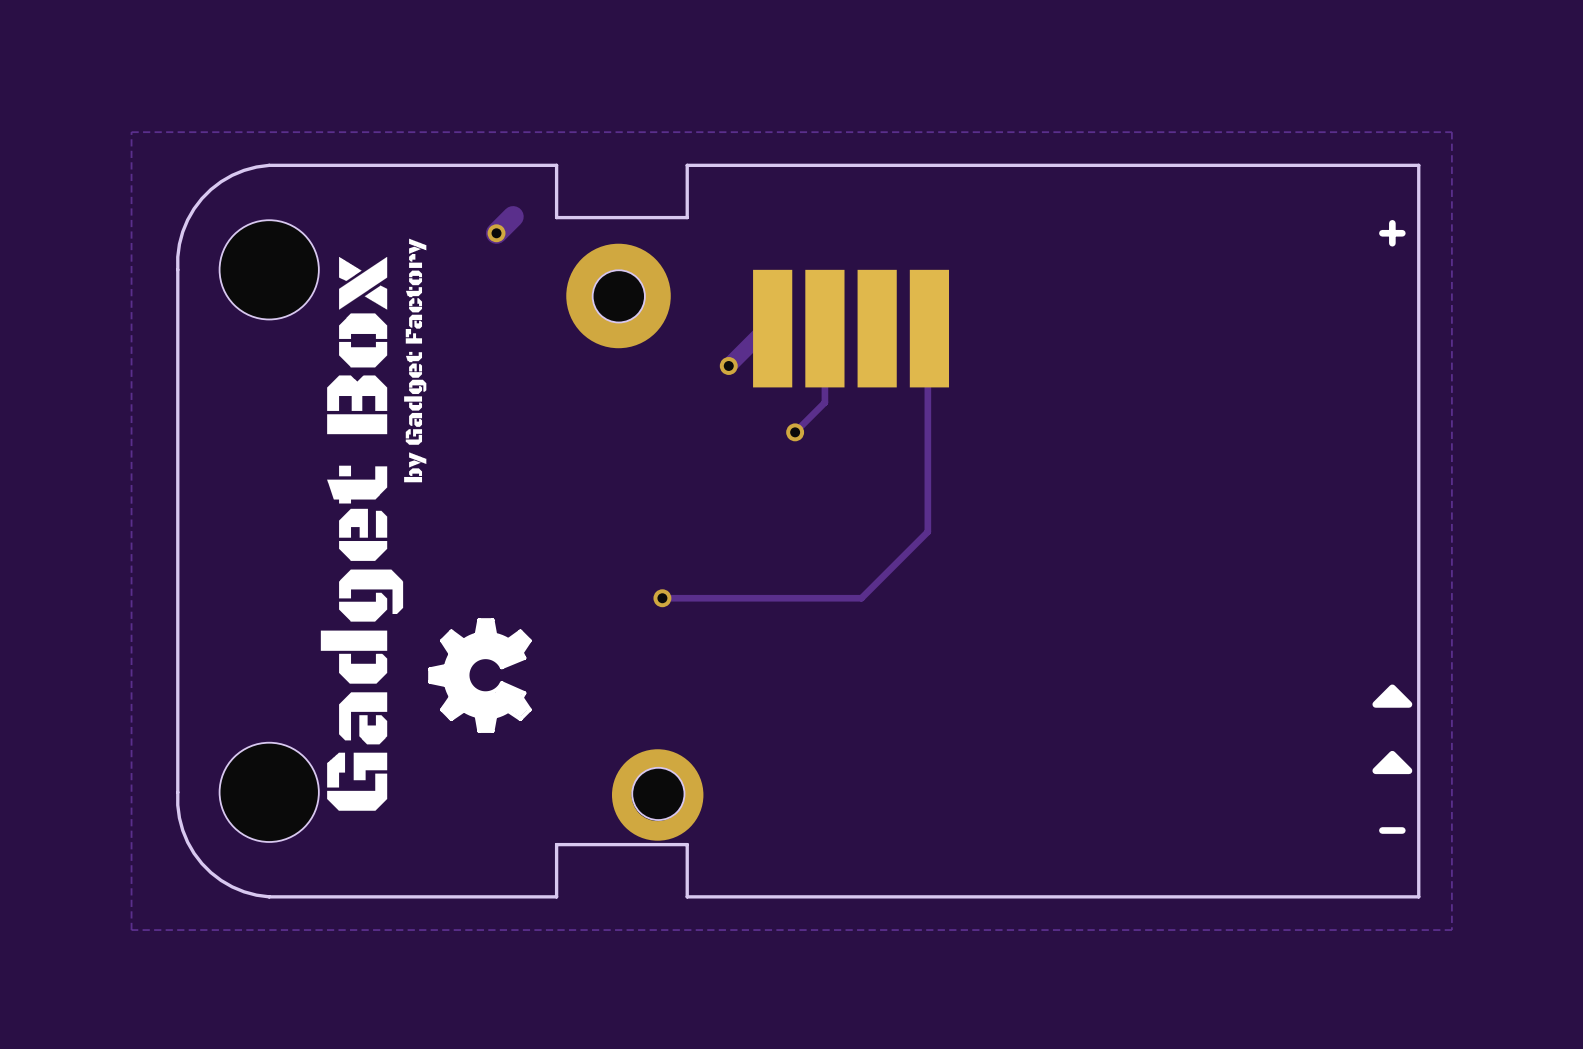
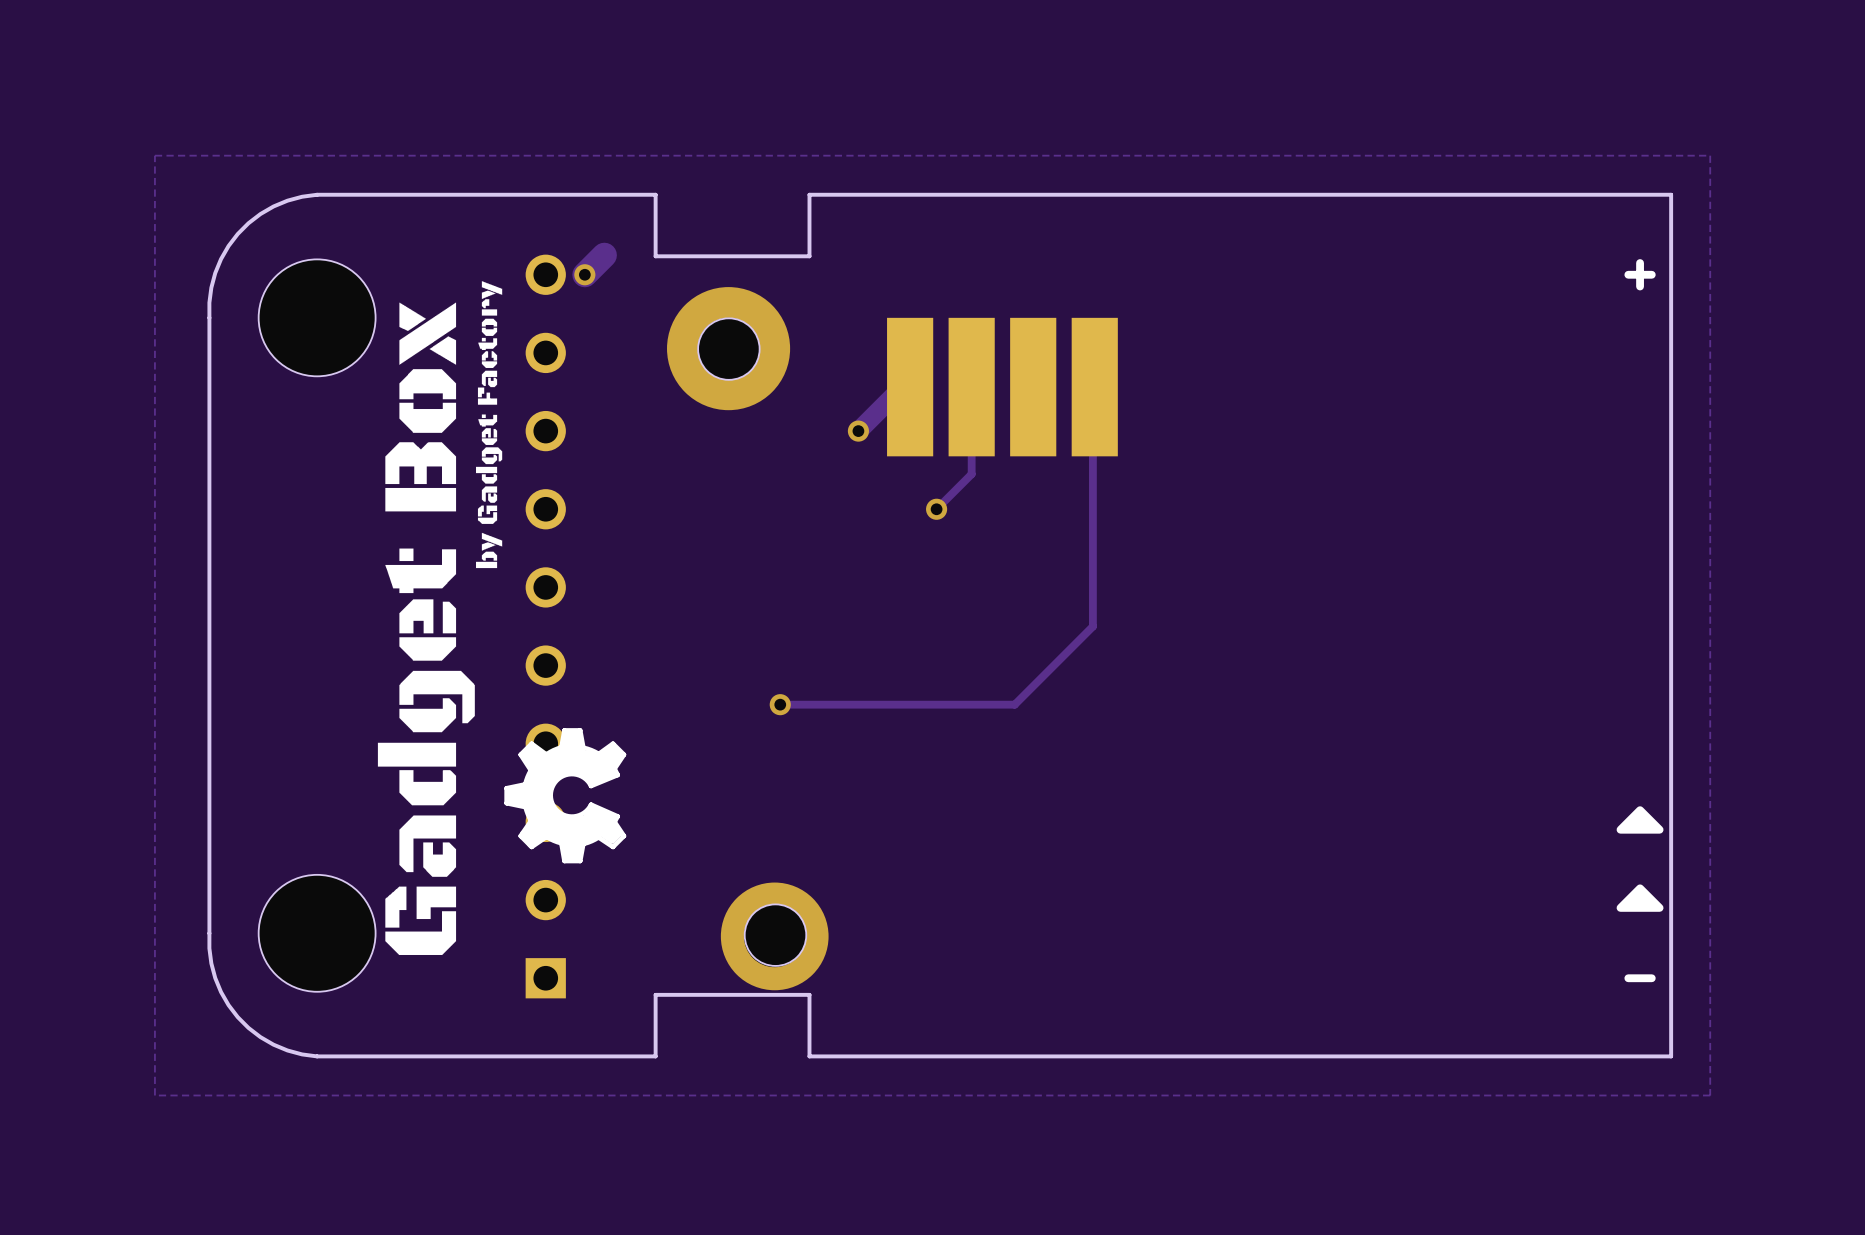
part footprint: [176, 163, 1421, 899] -> [207, 192, 1674, 1059]

